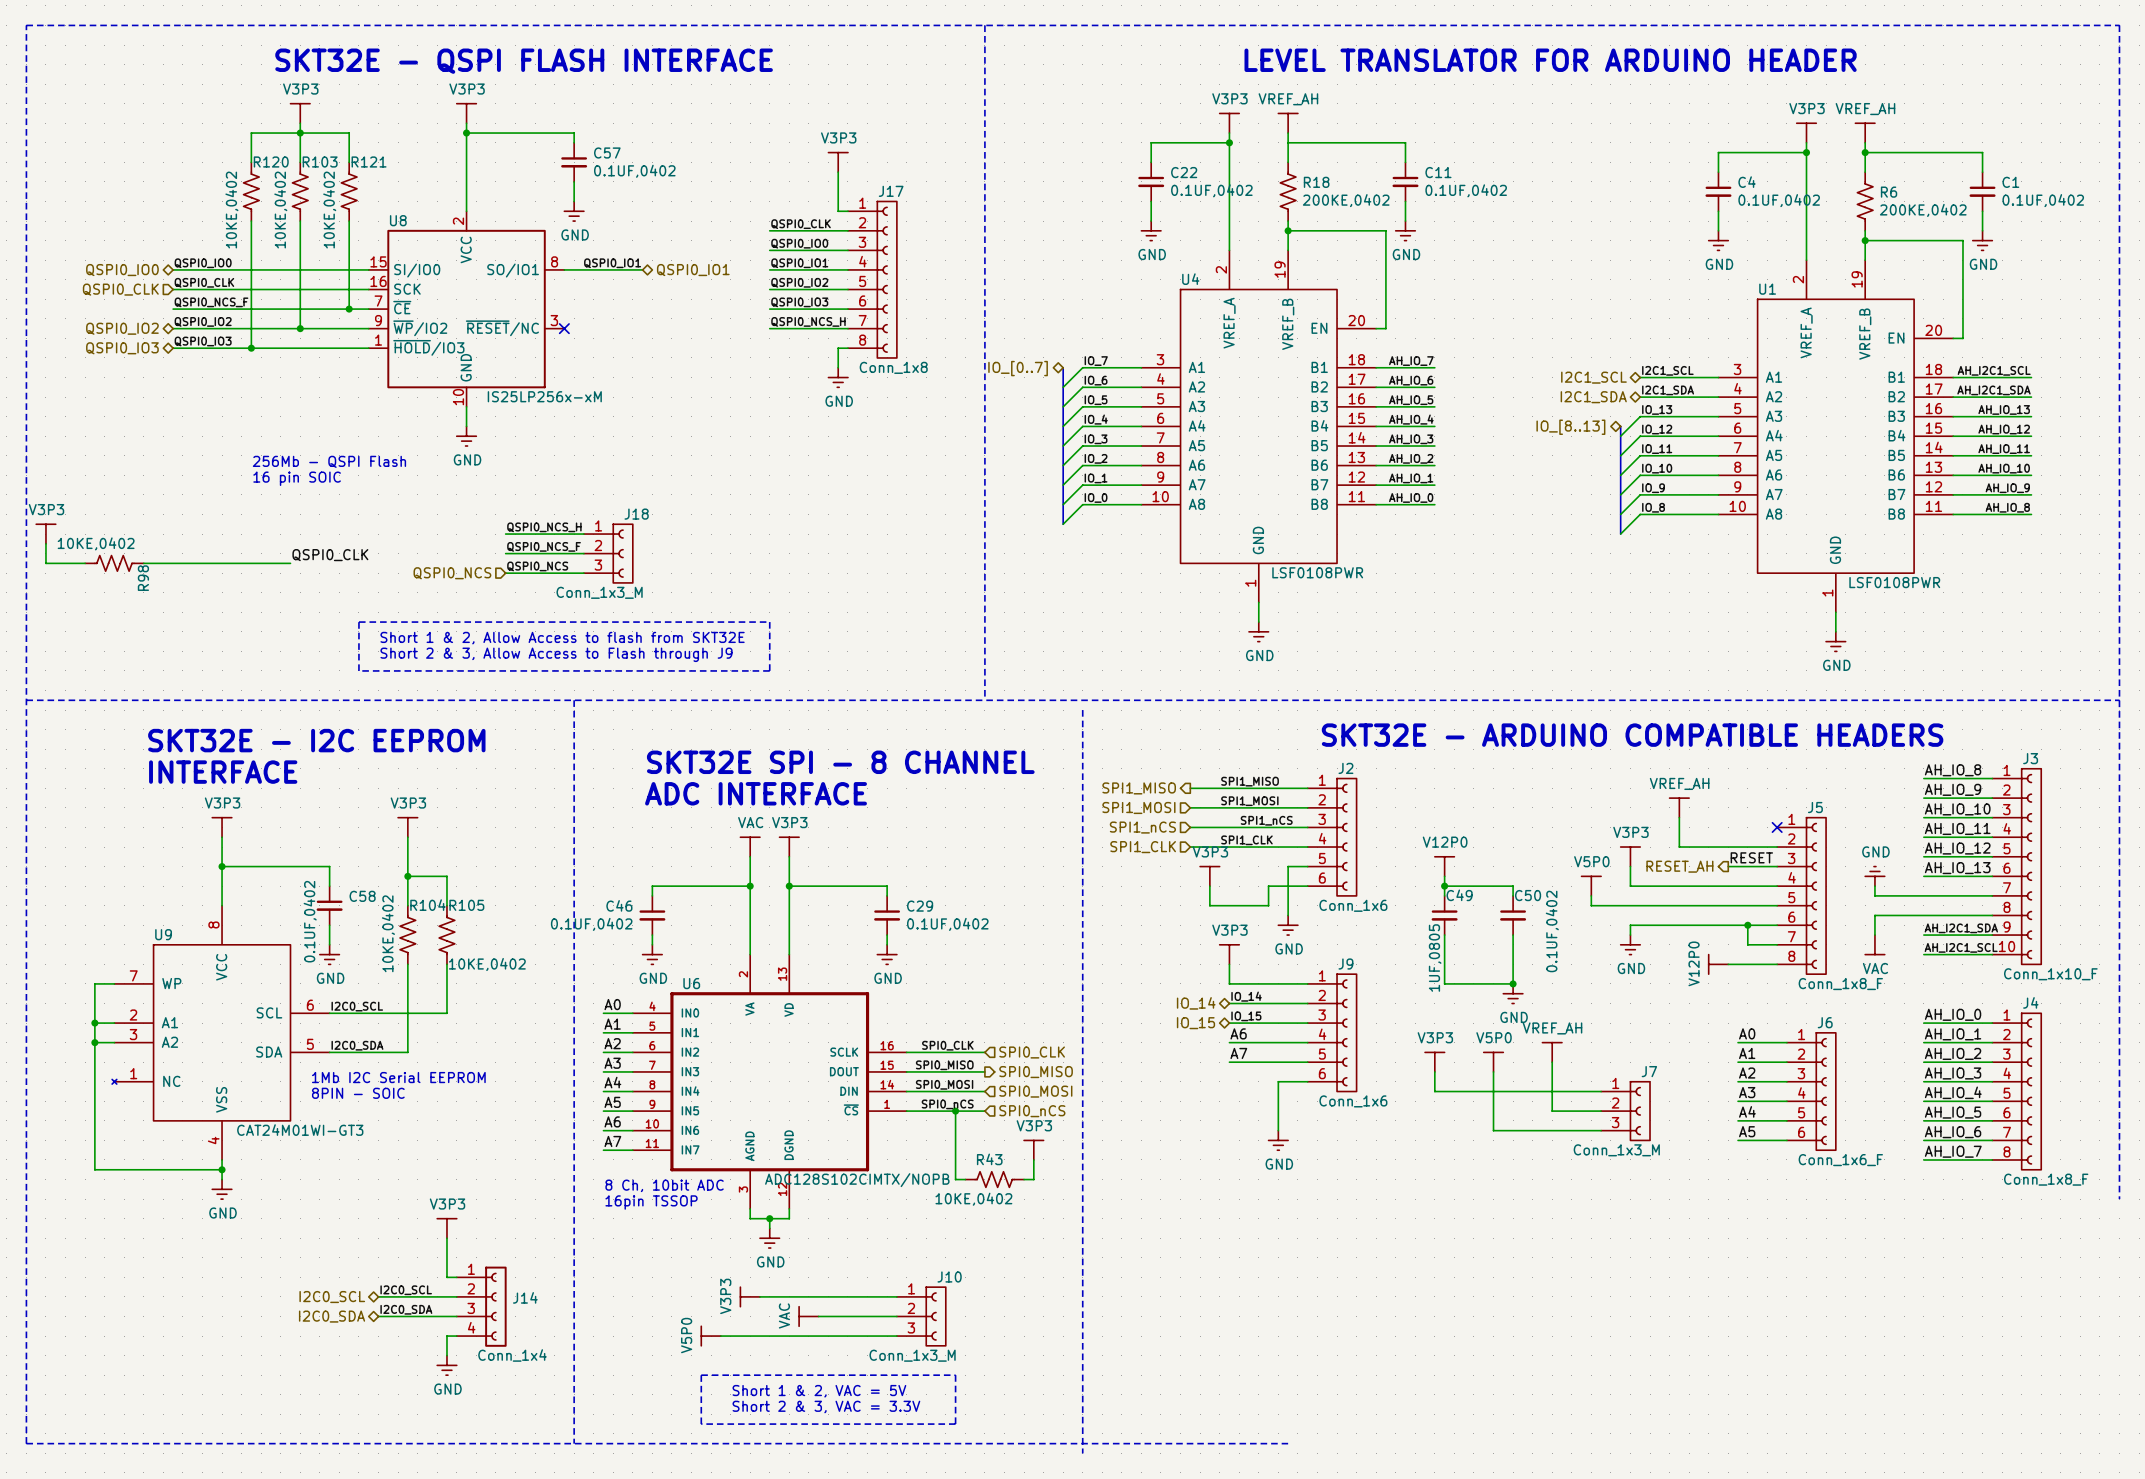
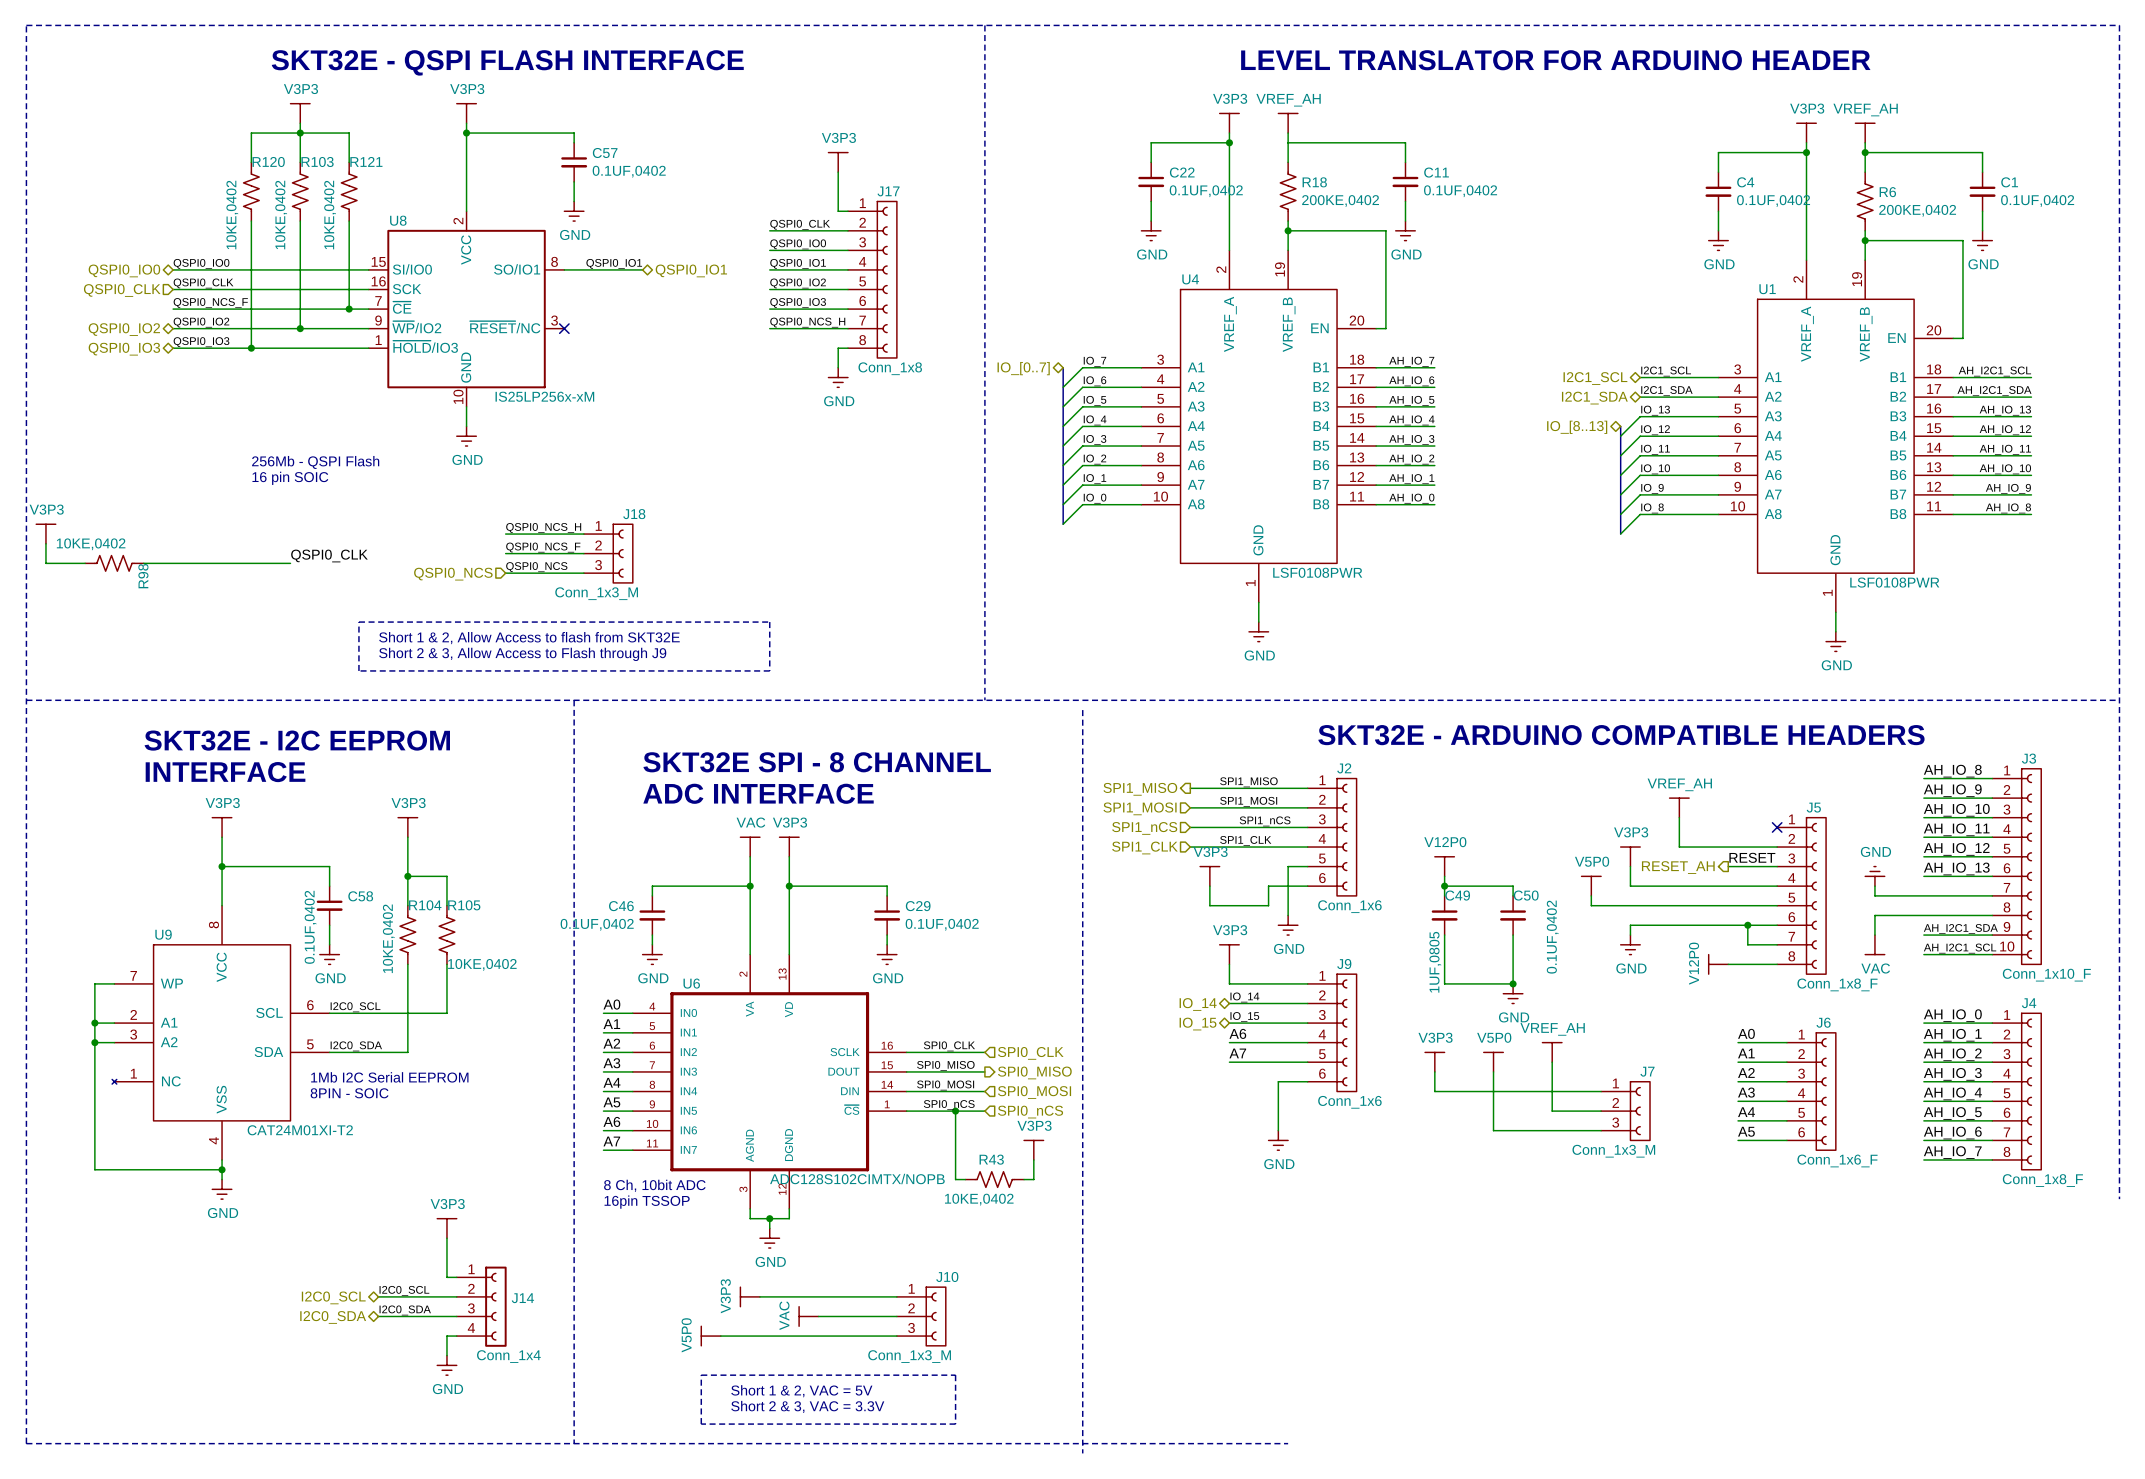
U9 value: CAT24M01WI-GT3 (300, 1130) -> CAT24M01XI-T2 (300, 1130)

